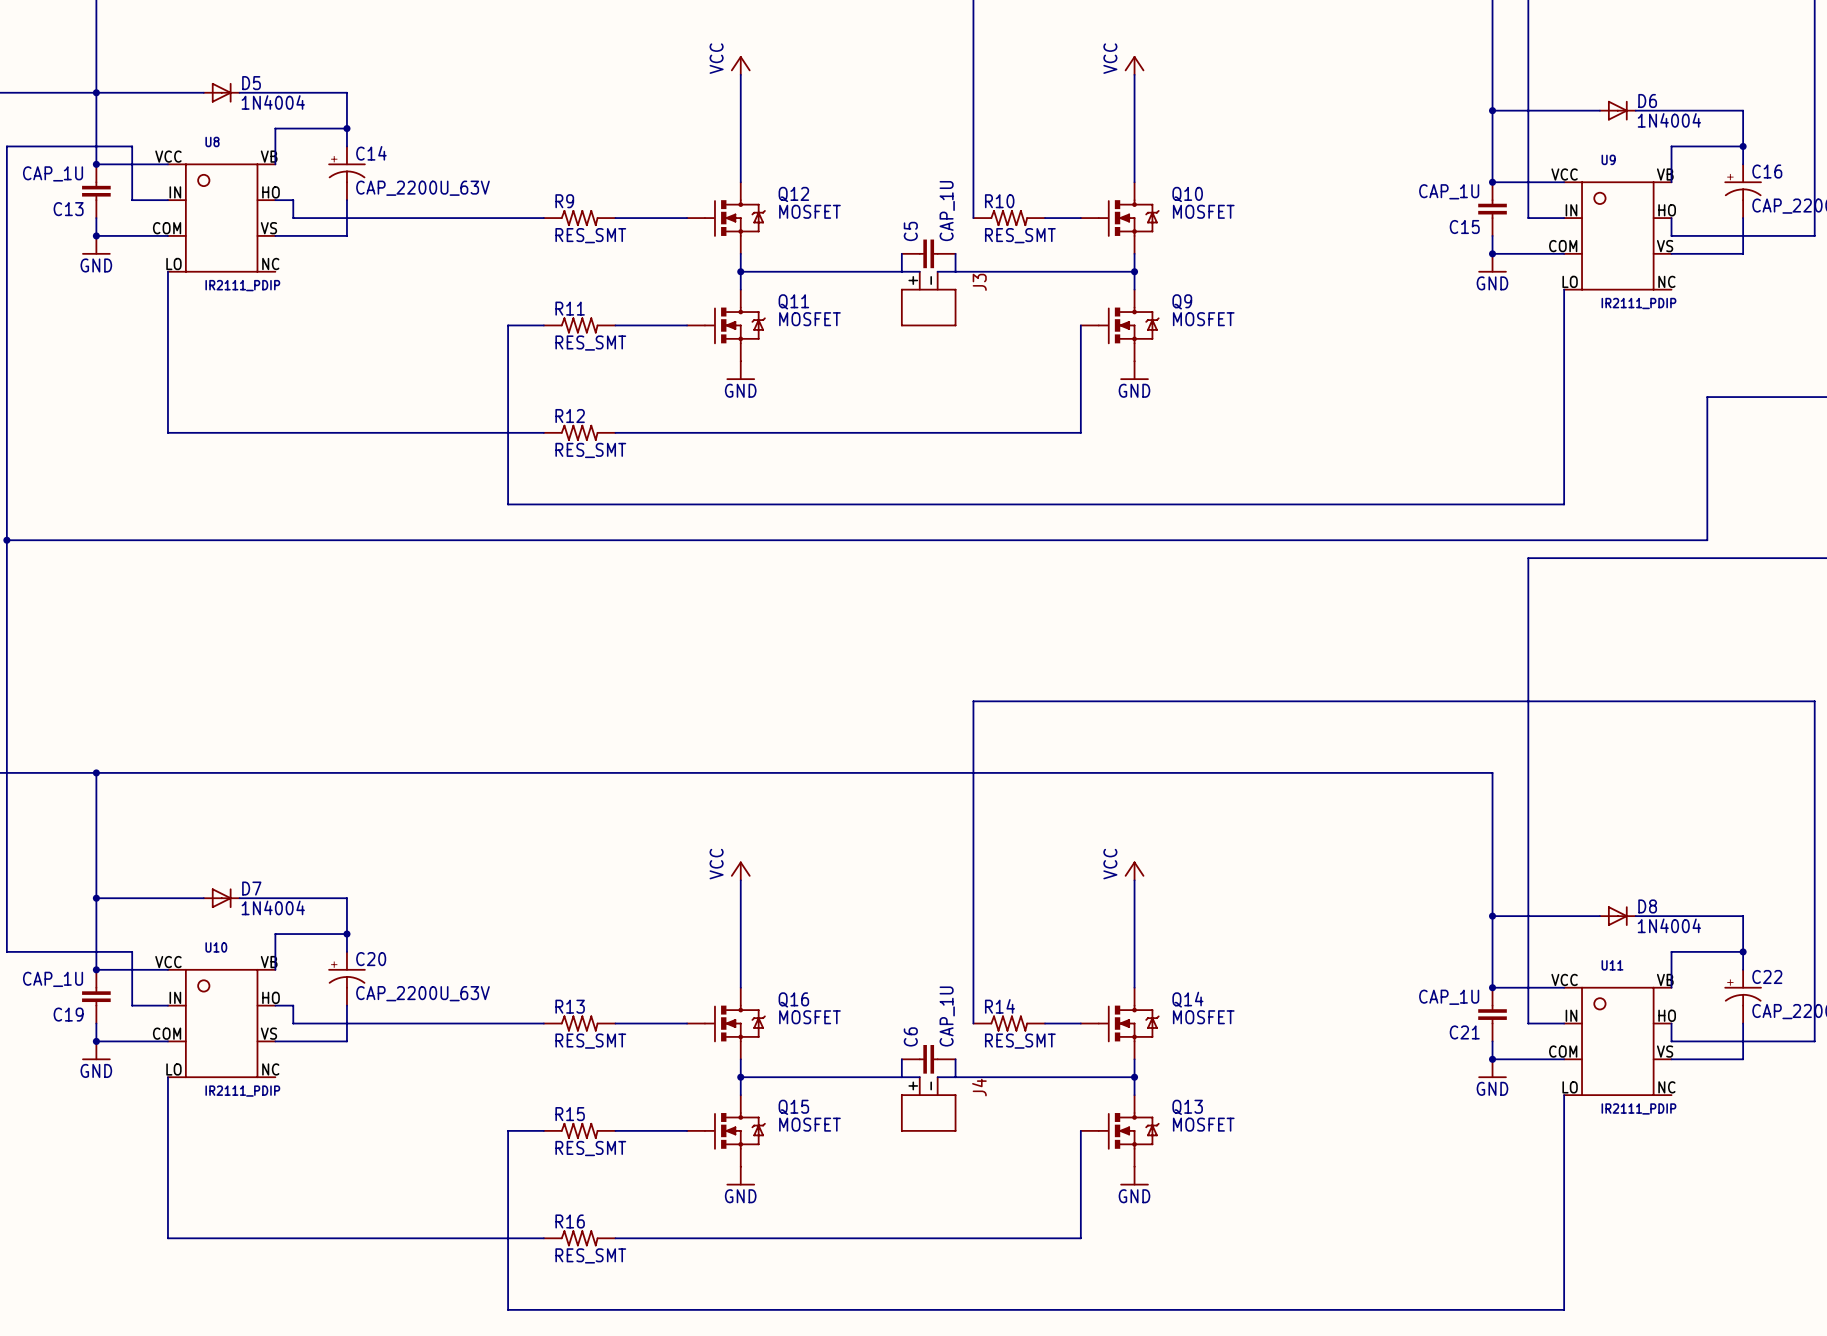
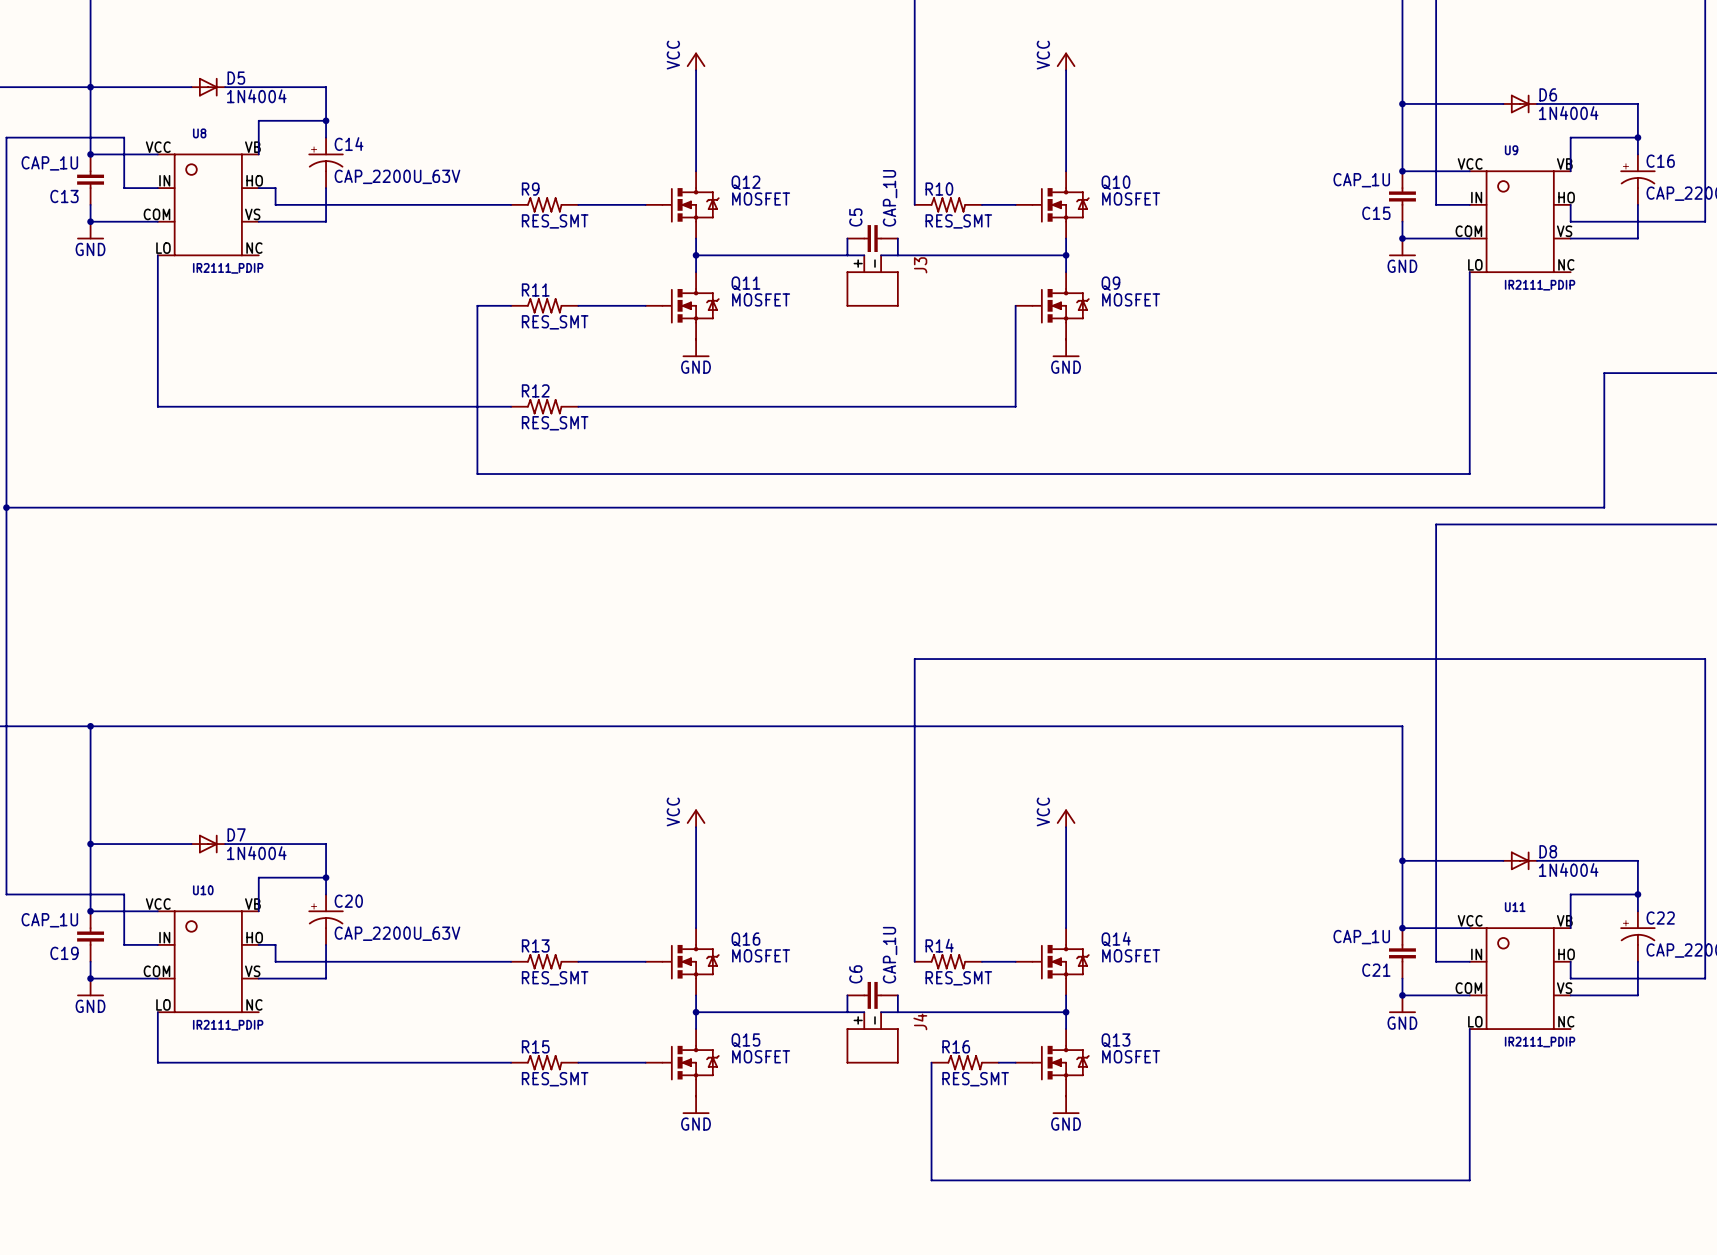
wire: (167, 1130) (167, 1238) (543, 1238) -> (157, 1062) (477, 1062)
wire: (508, 1130) (508, 1309) (1564, 1309) (1564, 1256) -> (931, 1062) (931, 1180) (1469, 1180)
wire: (1080, 1130) (1080, 1238) (615, 1238) -> (1015, 1062) (998, 1062)
R16 position: (579, 1238) -> (965, 1062)

